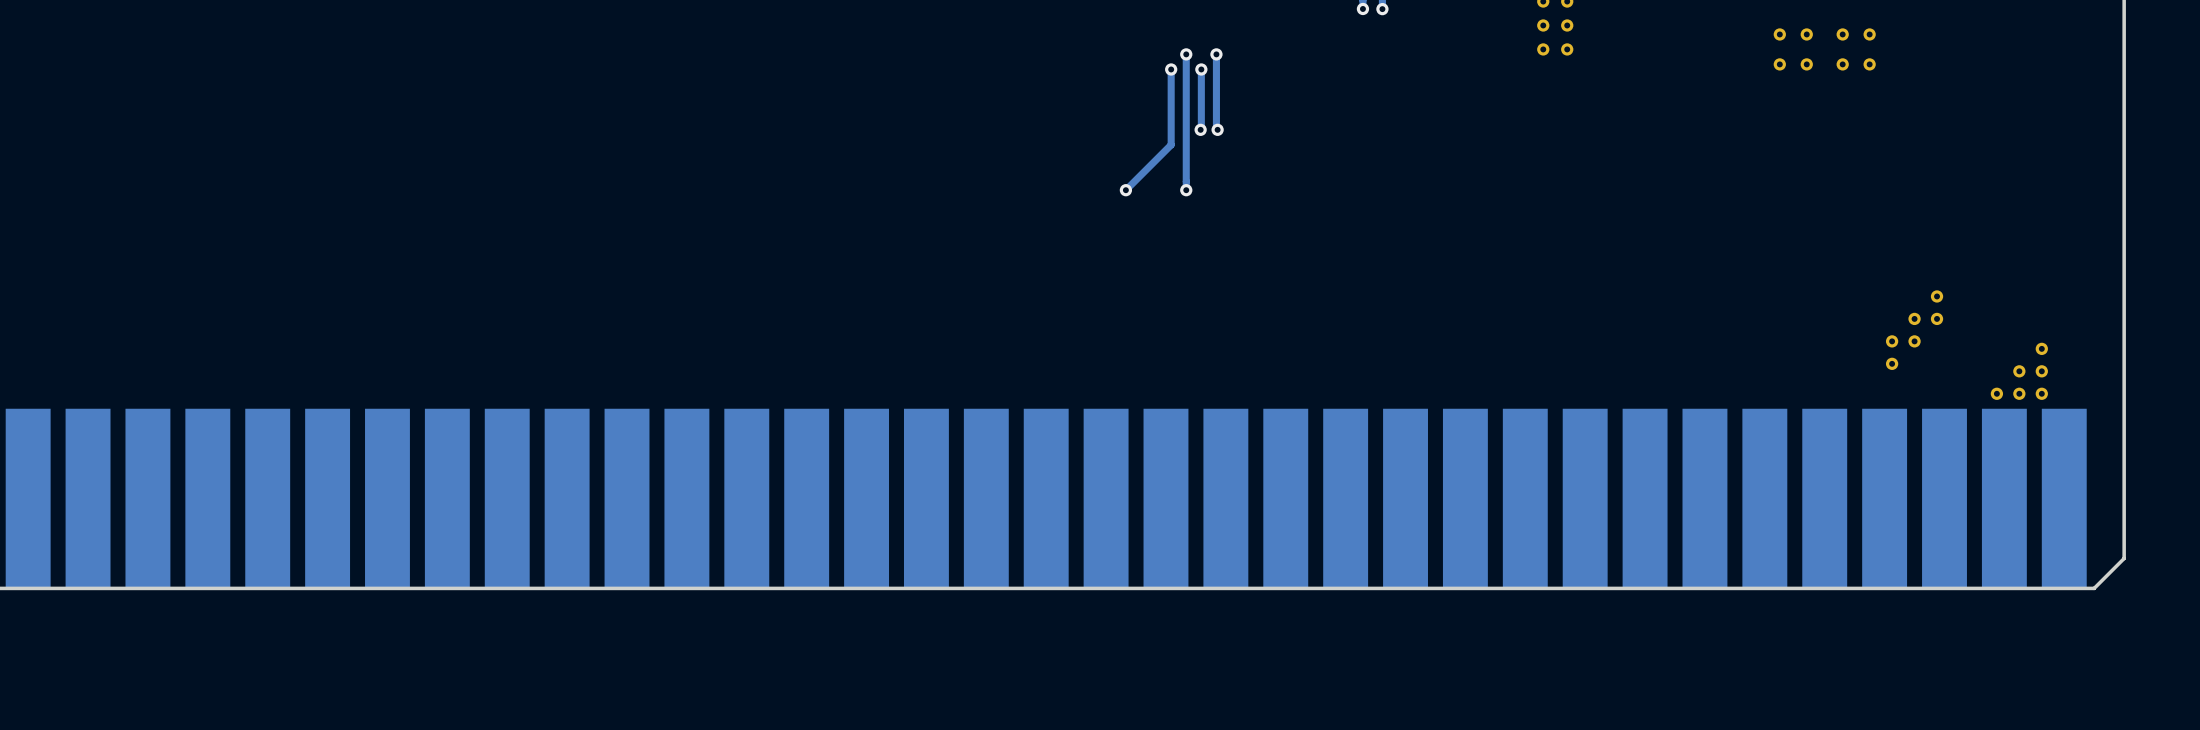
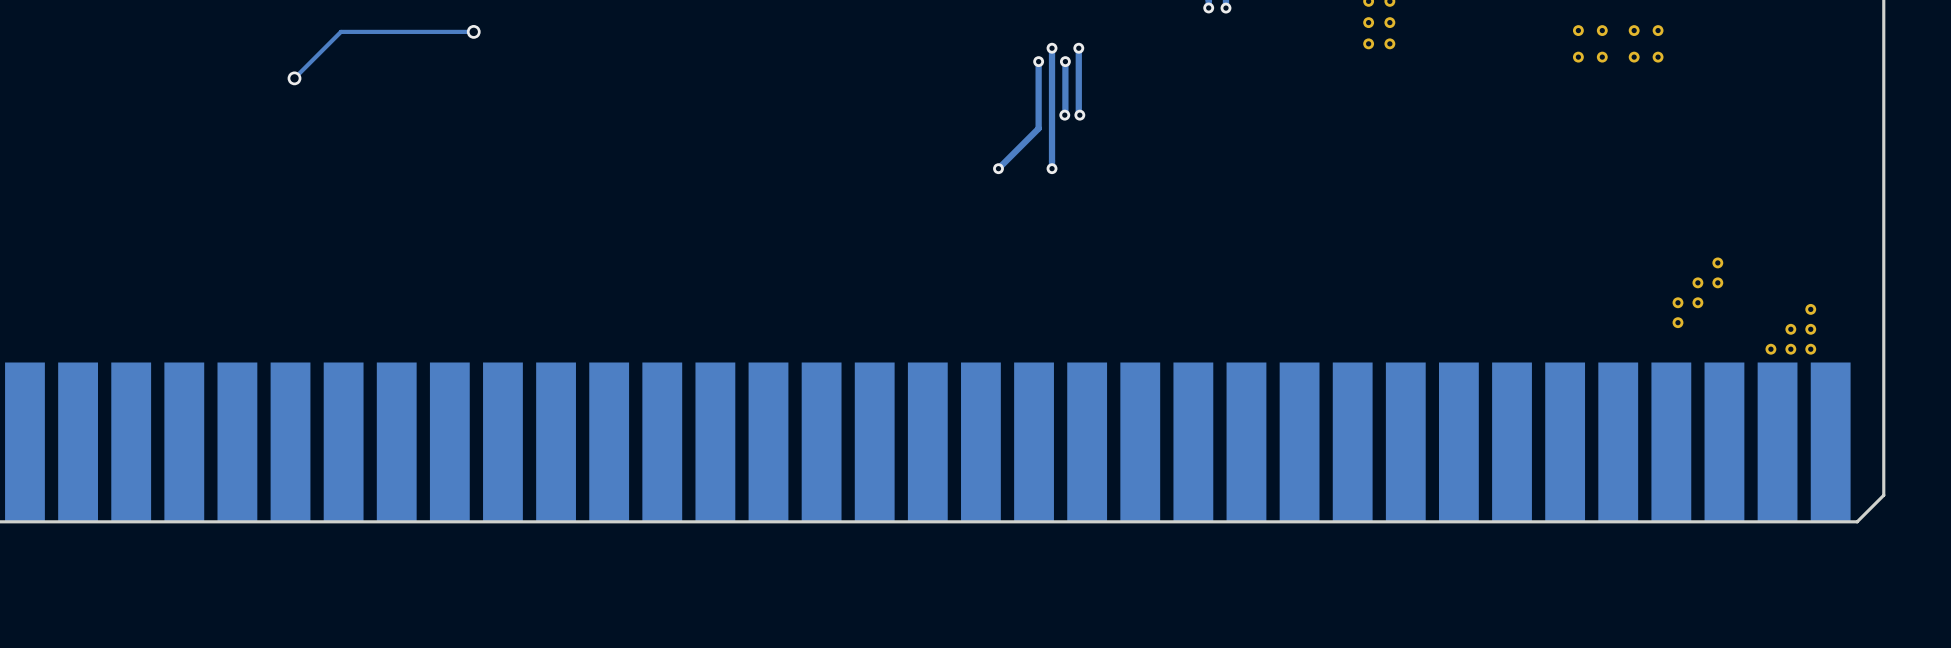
track: none -> (473, 31) (340, 31) (294, 78)
via: none -> (473, 31)
via: none -> (294, 78)

